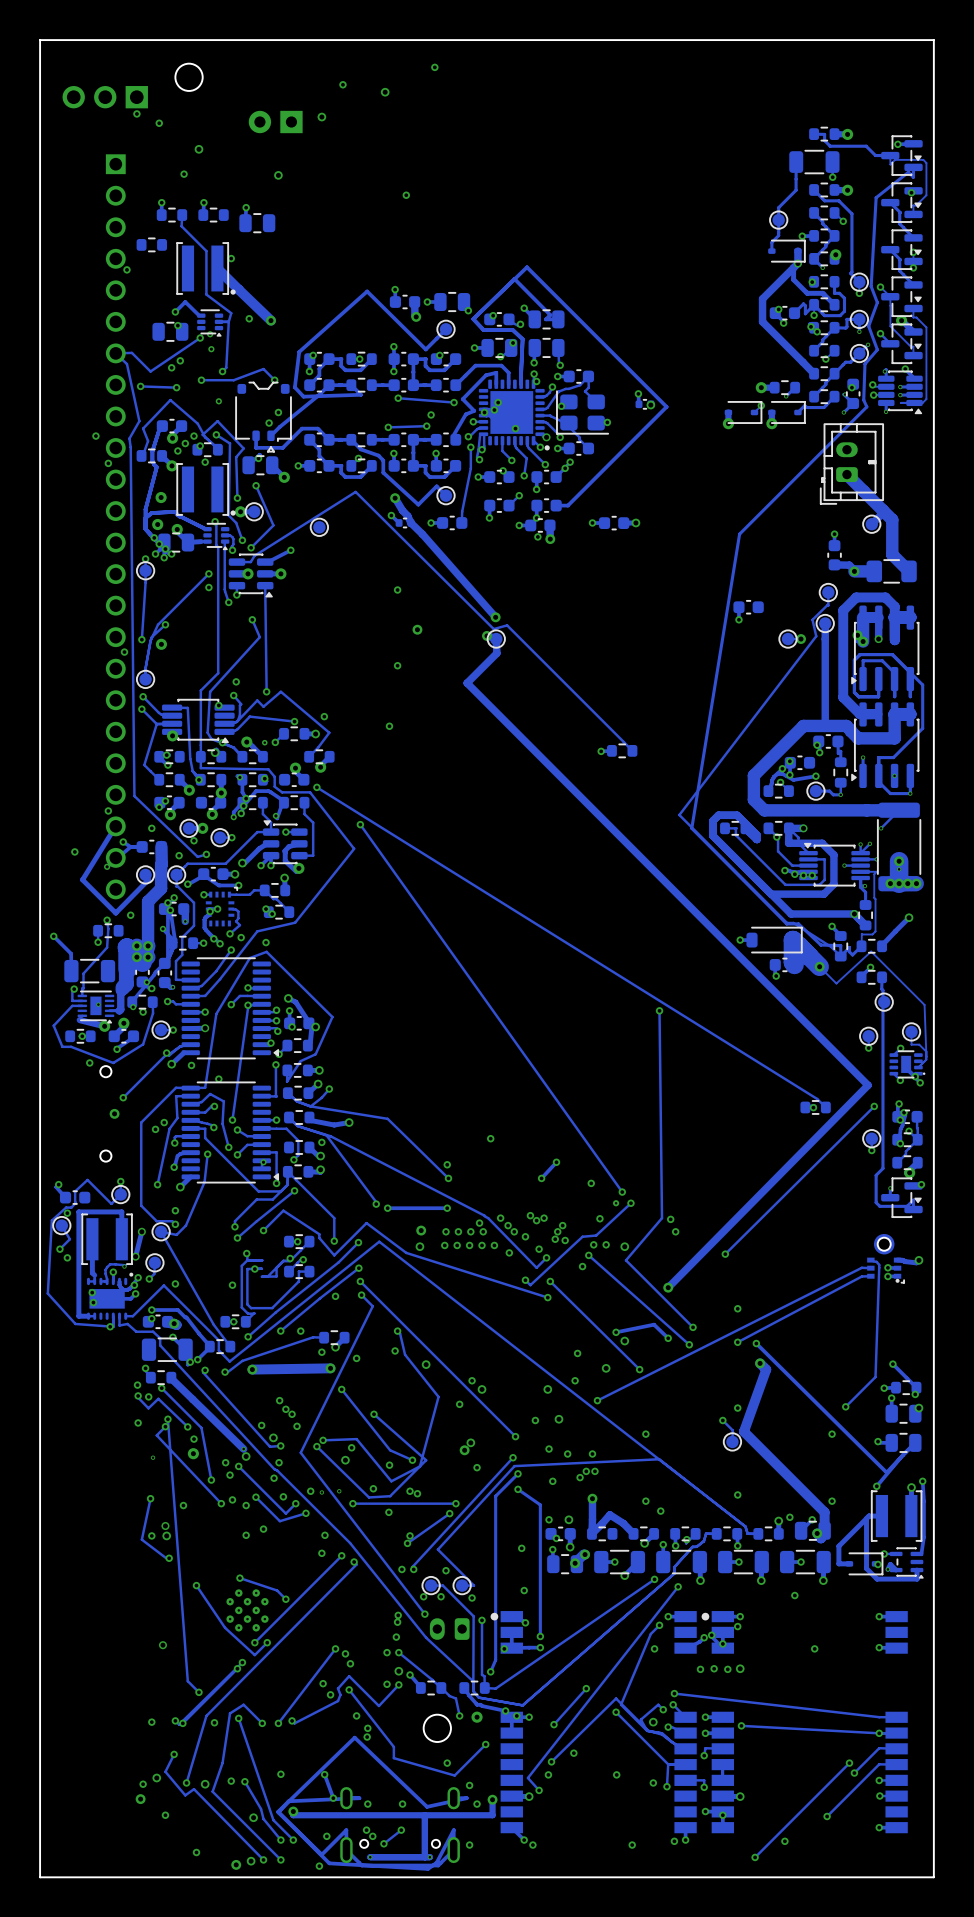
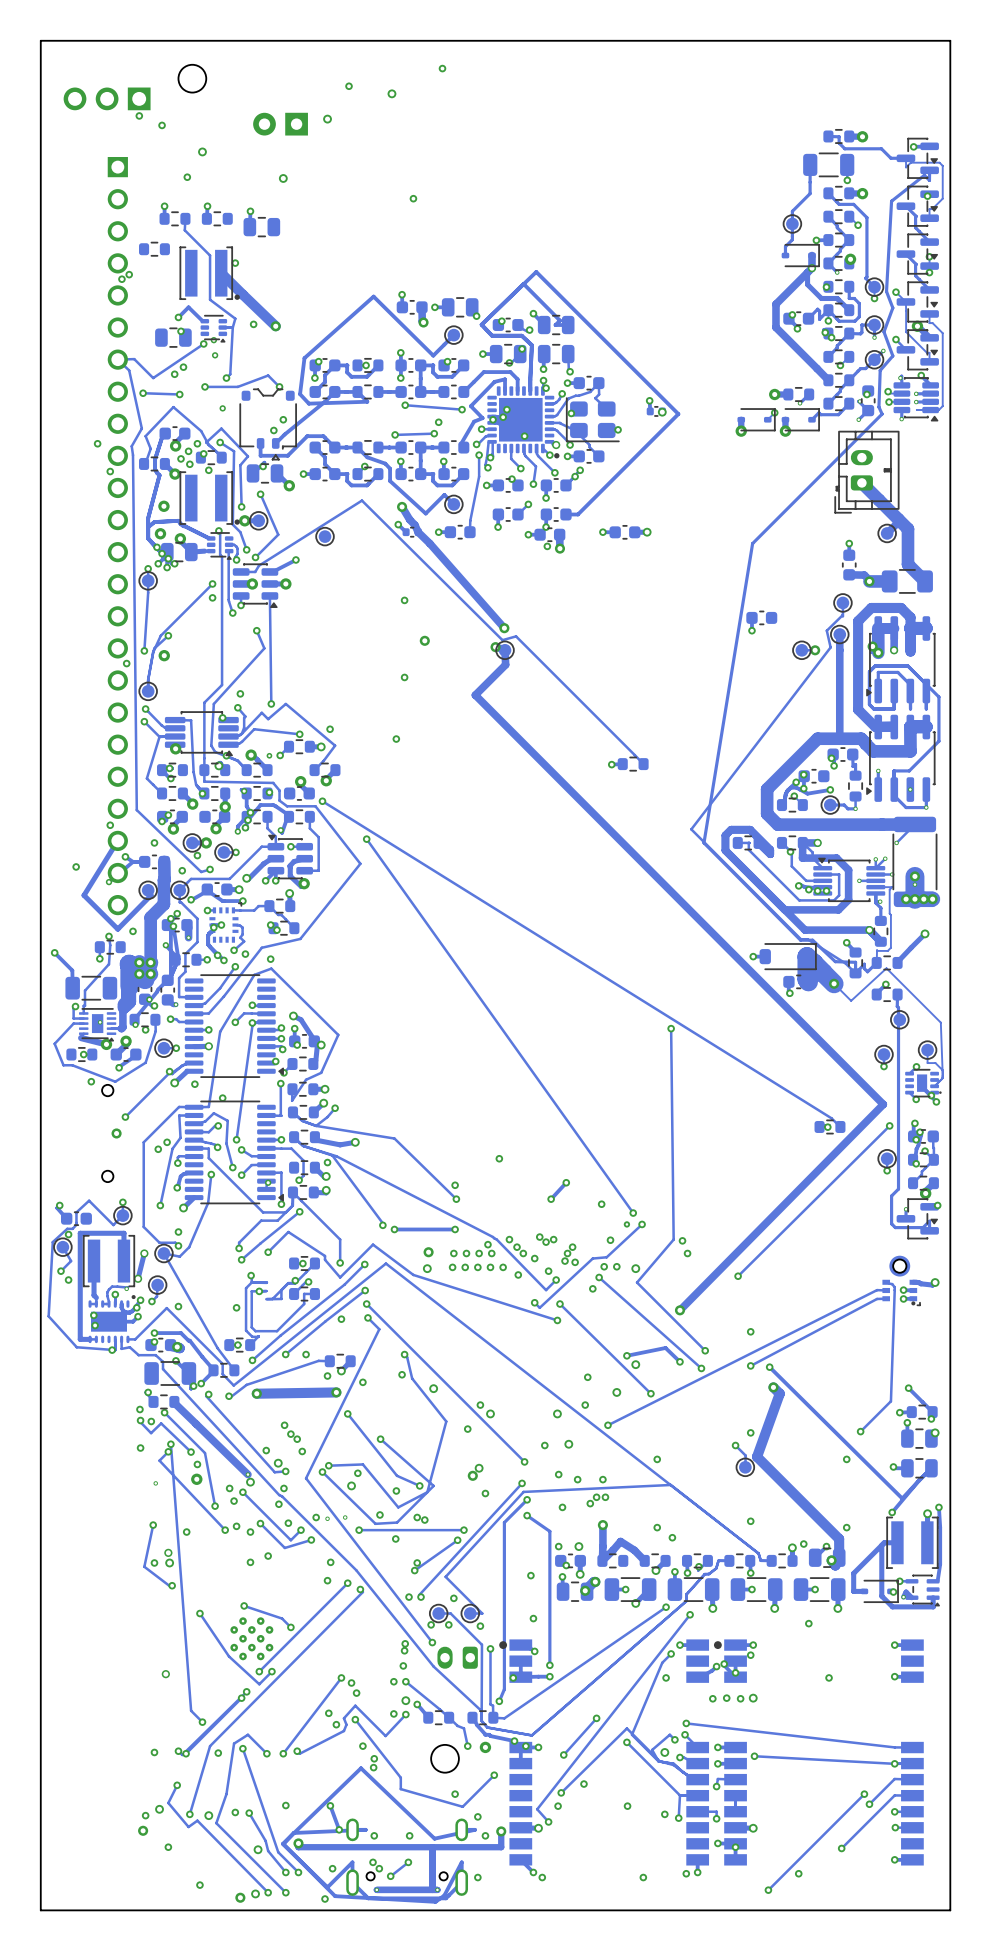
via: none -> (121, 279)
via: none -> (189, 464)

